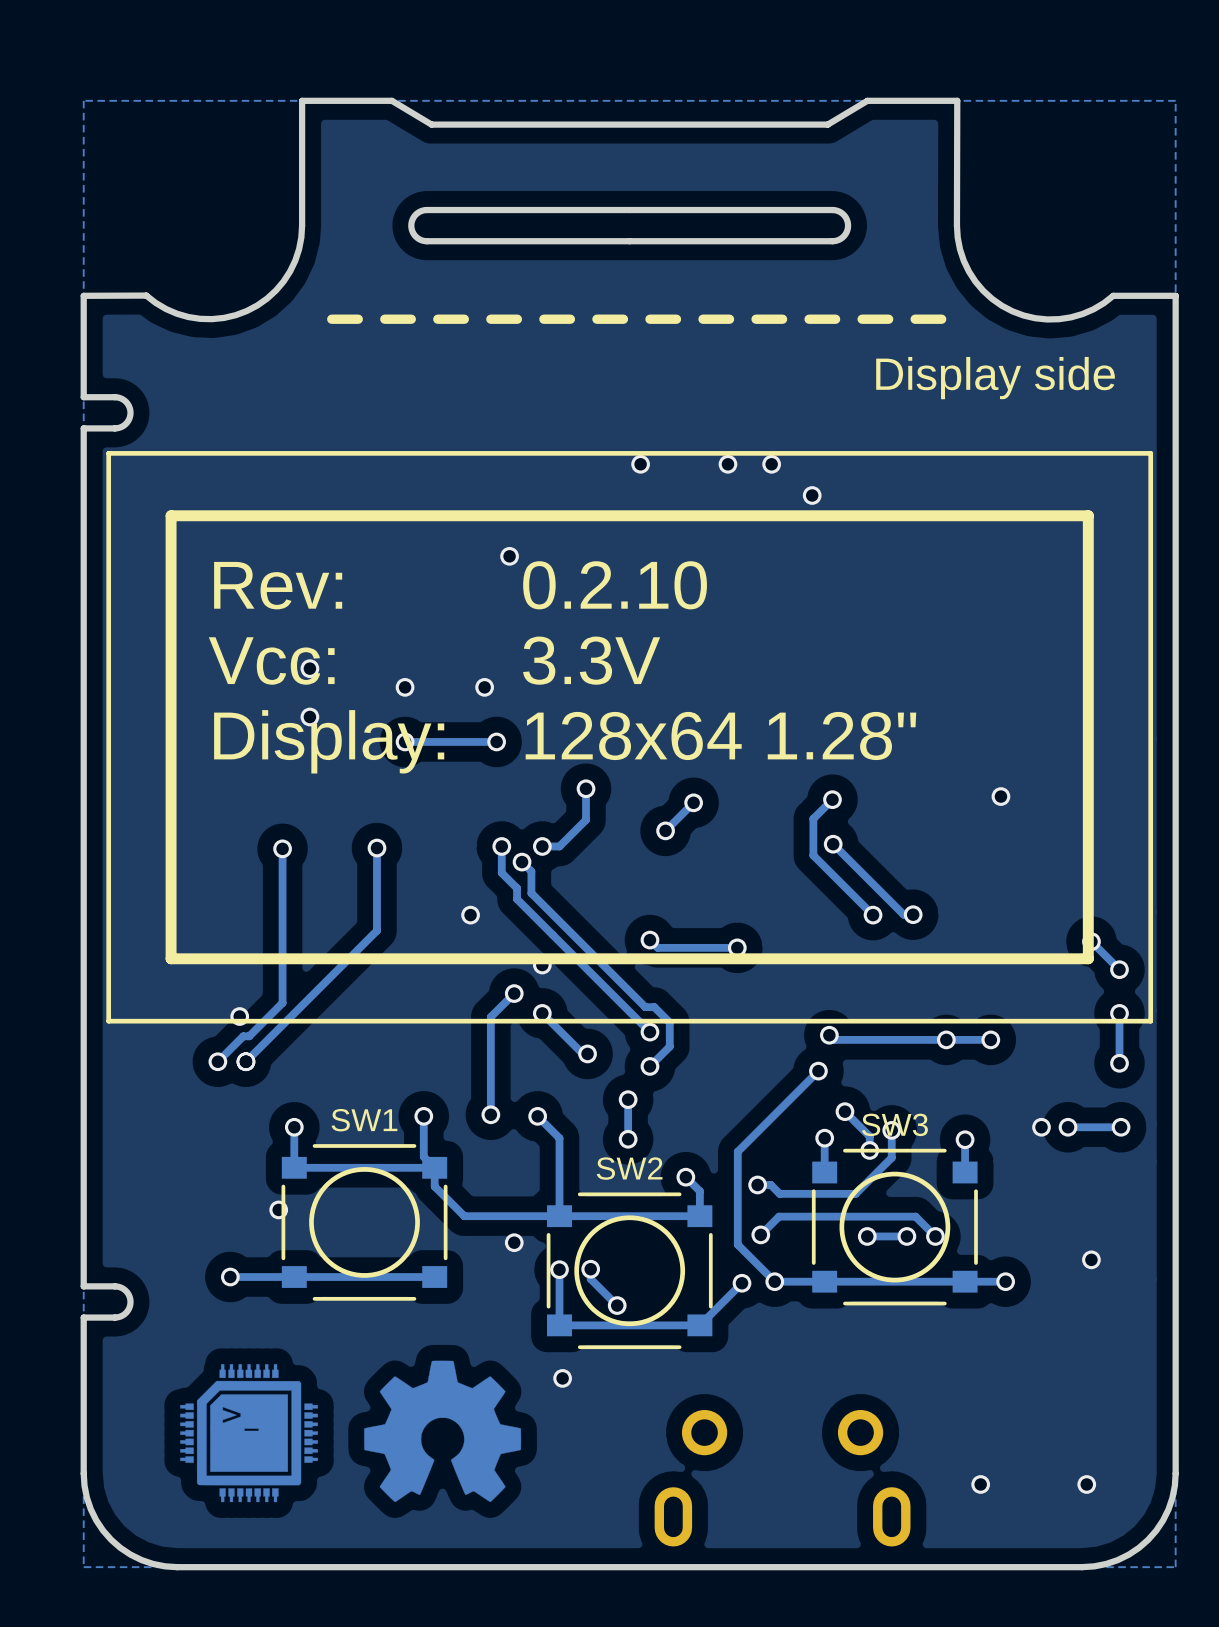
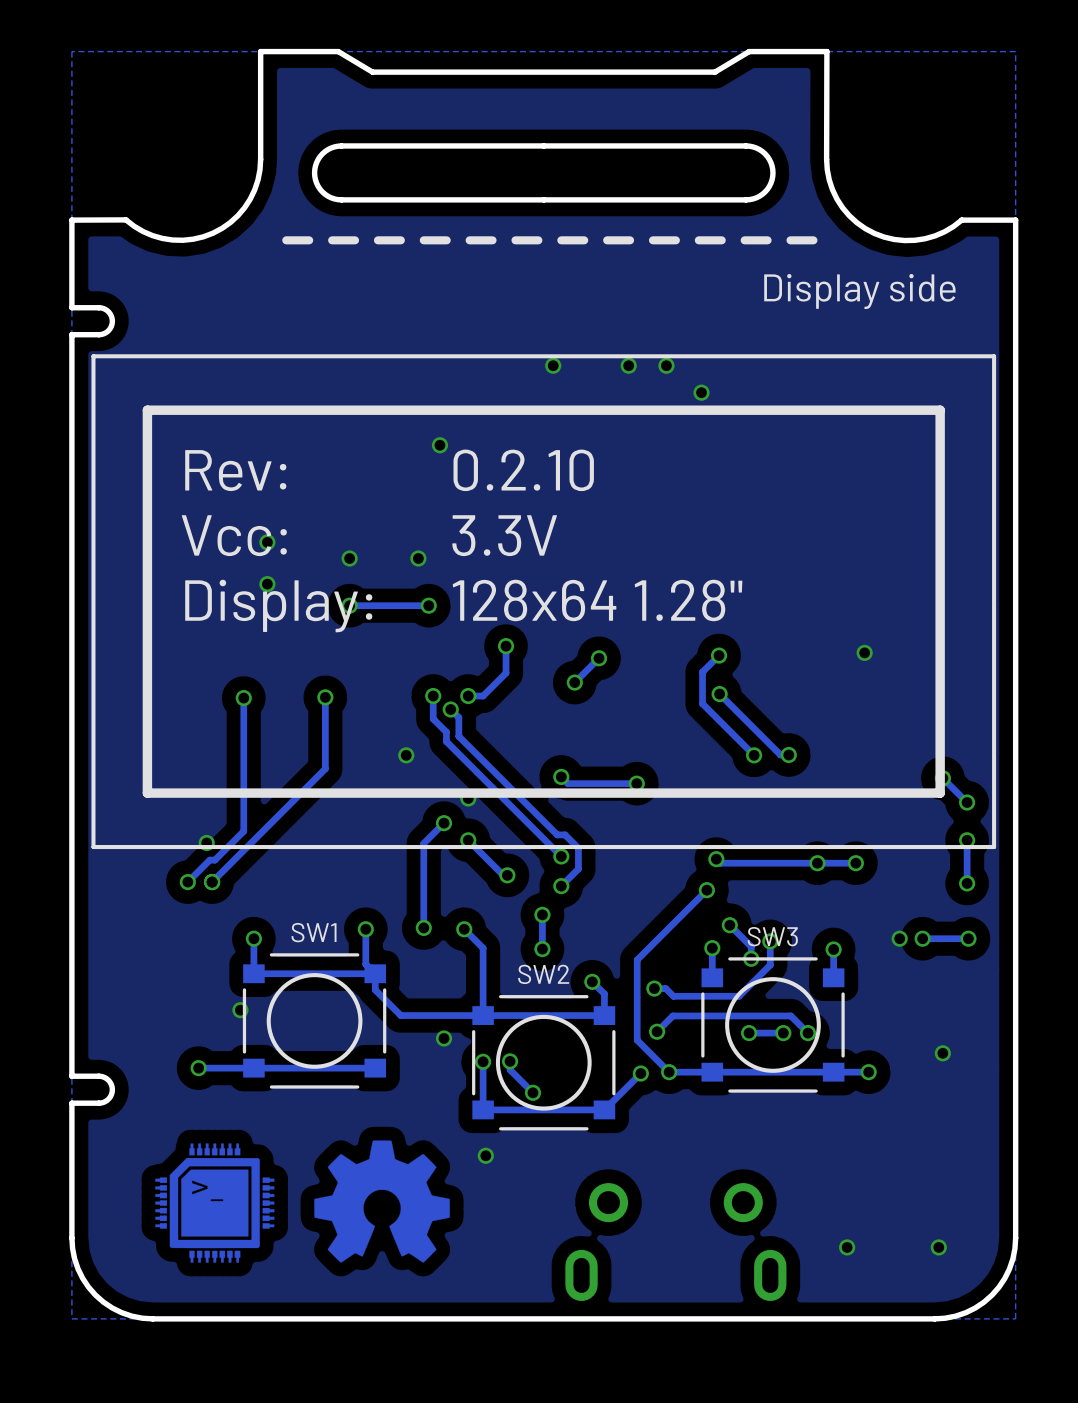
board edge: (832, 210) (843, 214) (848, 225) (843, 236) (832, 241) (424, 241) (415, 236) (411, 225) (415, 214) (426, 210) -> (719, 145) (749, 146) (765, 153) (770, 162) (772, 172) (770, 183) (765, 191) (756, 197) (746, 199) (341, 199) (331, 197) (322, 191) (316, 183) (314, 172) (316, 162) (322, 153) (338, 146) (368, 145)

